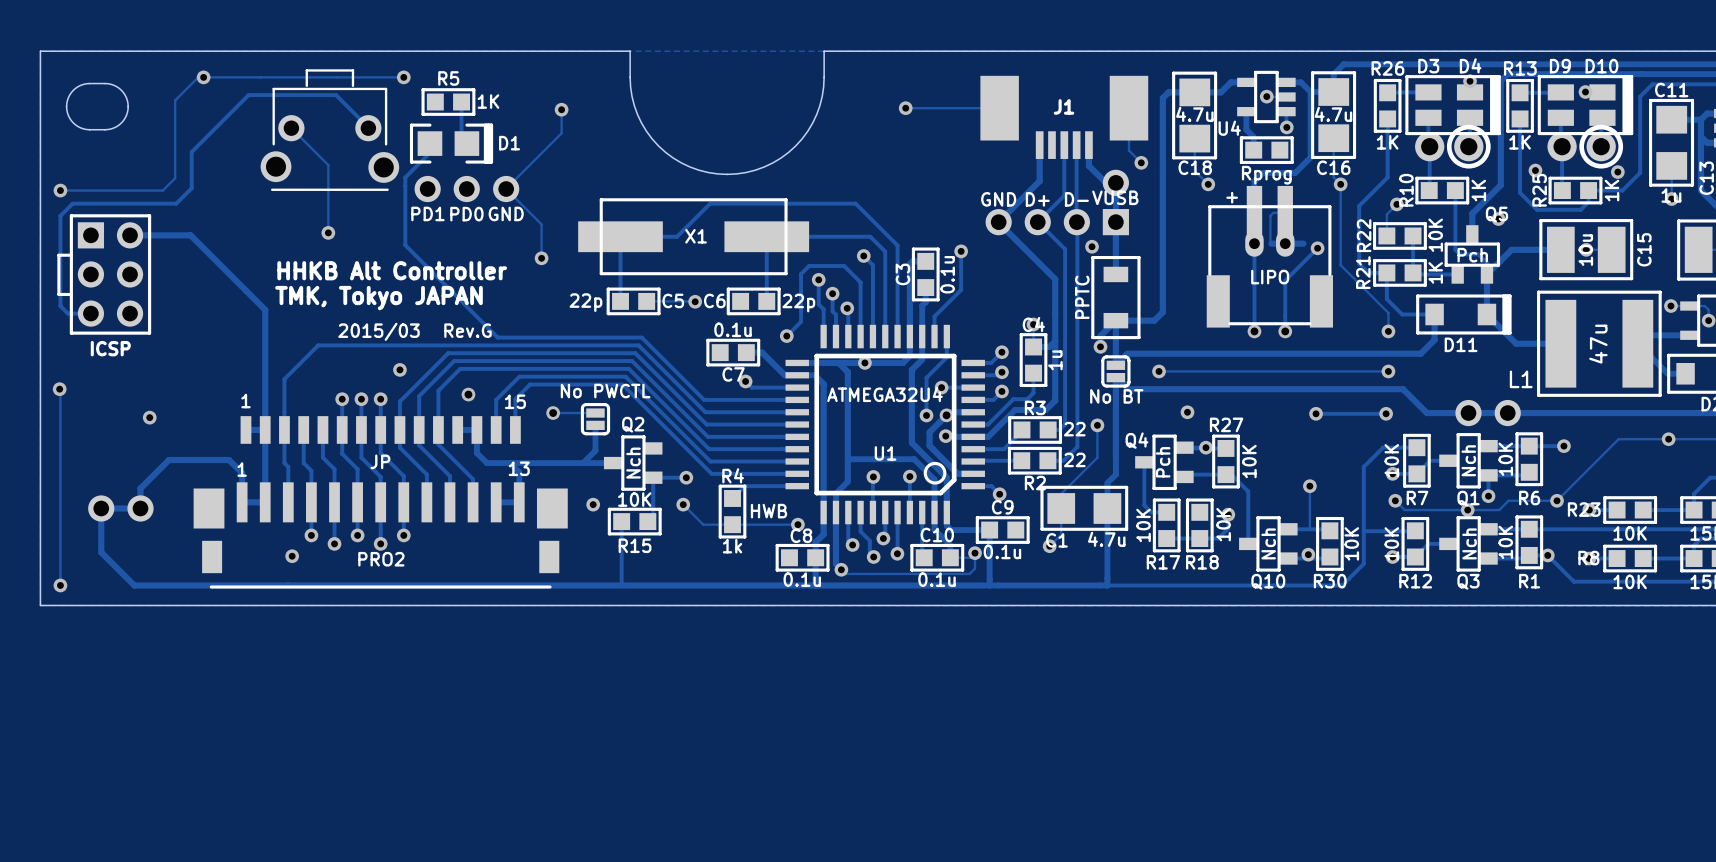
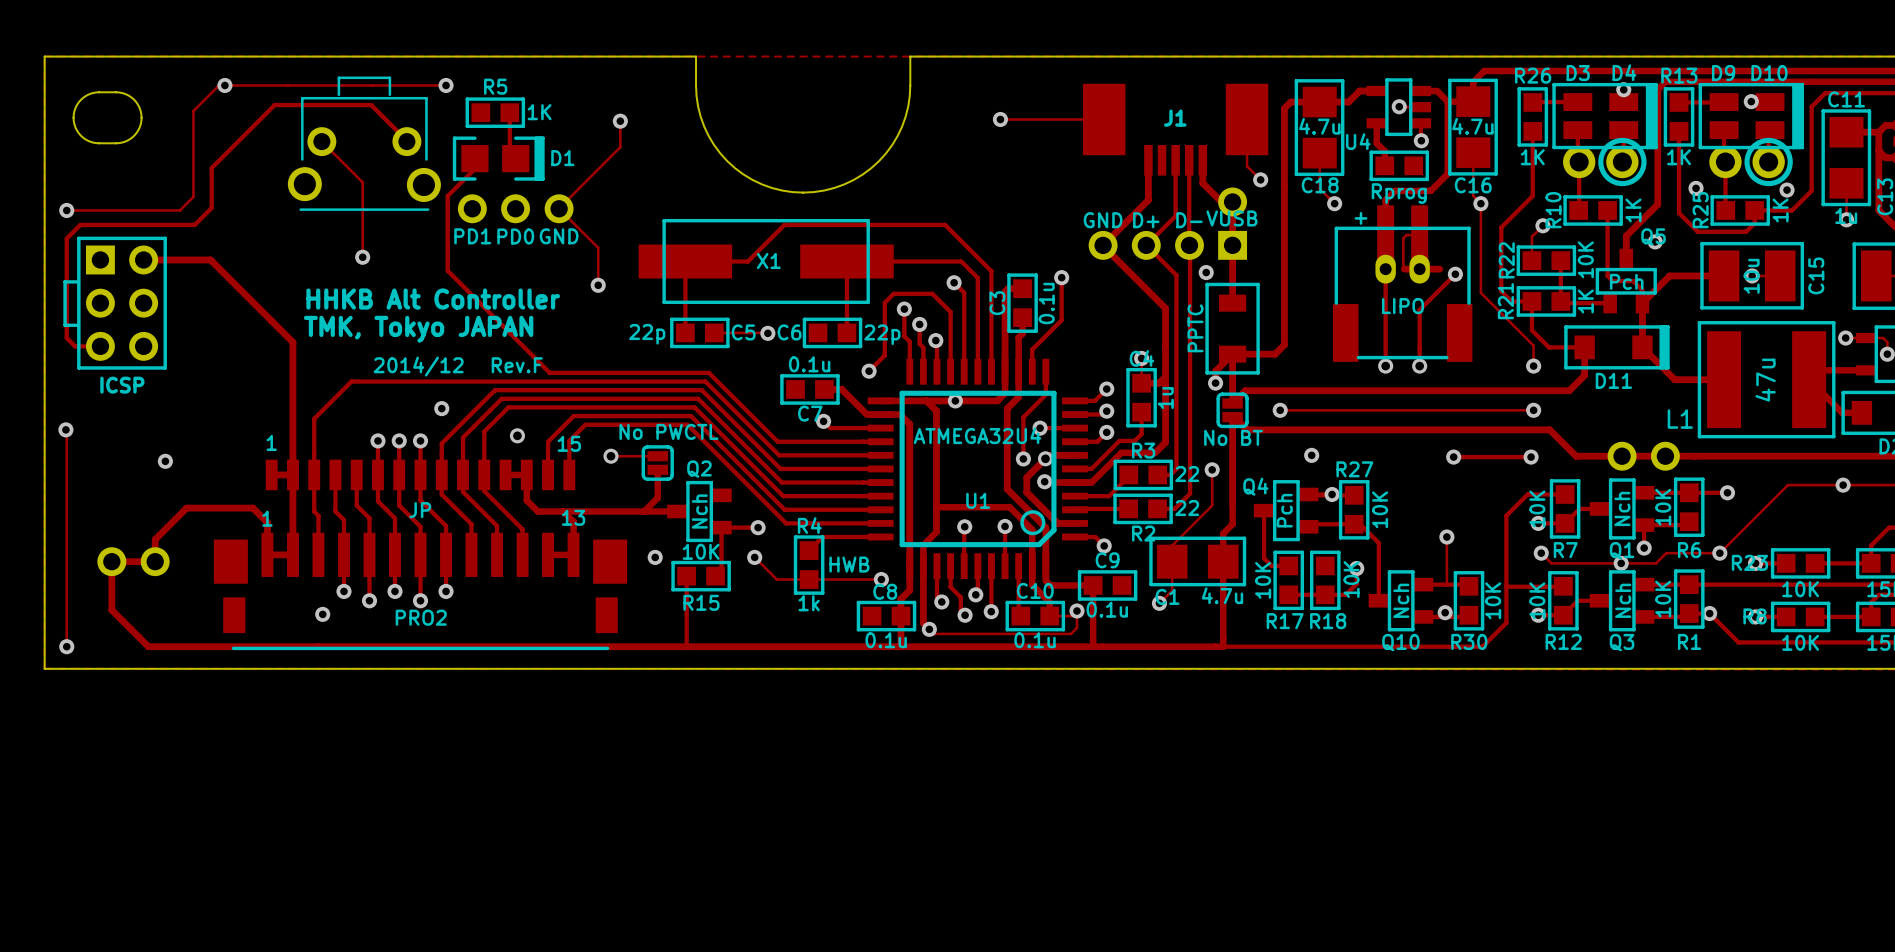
text: Rev.G (467, 330) -> Rev.F (517, 365)
text: 2015/03 (379, 331) -> 2014/12 (418, 366)

